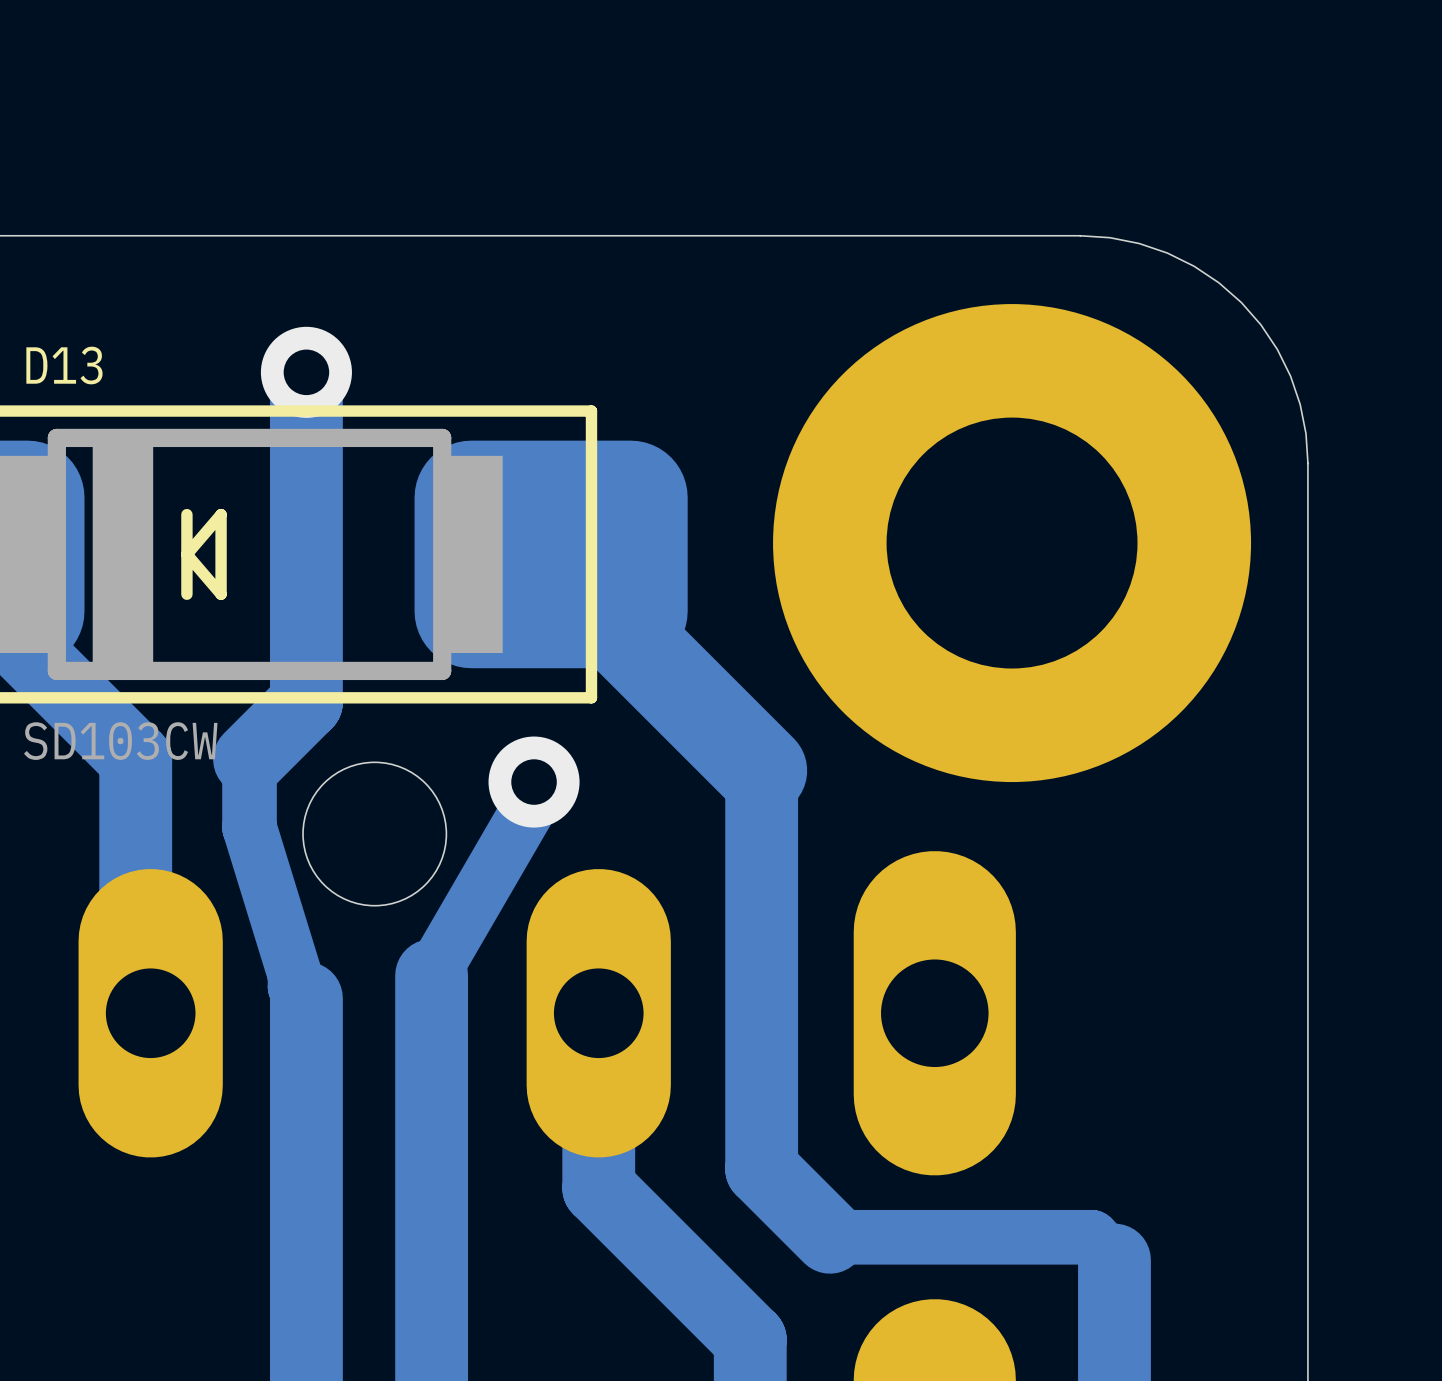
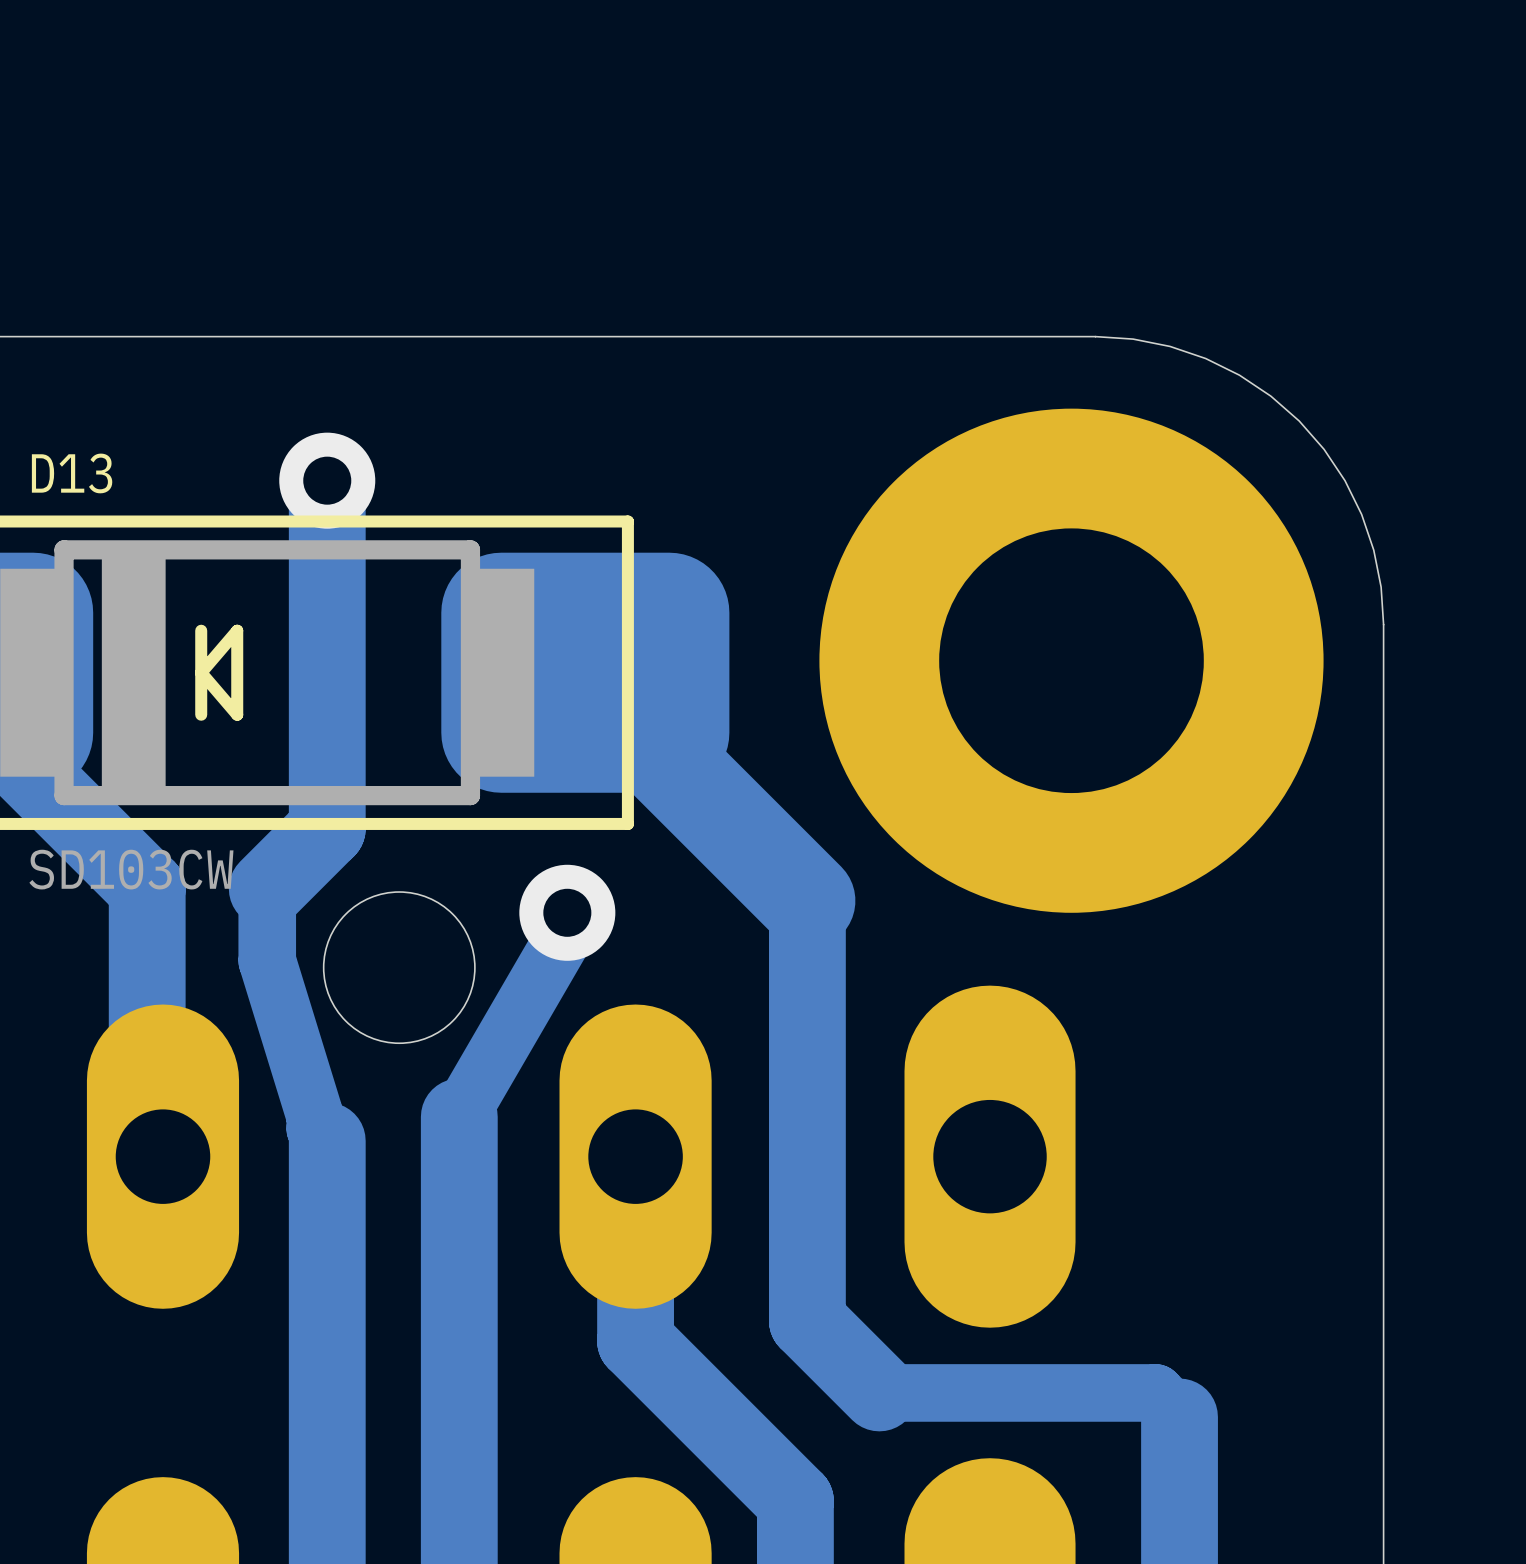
board edge: (1034, 235) (1110, 237) (1139, 243) (1167, 253) (1194, 266) (1218, 282) (1241, 302) (1260, 324) (1277, 349) (1290, 376) (1300, 404) (1306, 433) (1307, 508) -> (1095, 336) (1133, 339) (1170, 346) (1205, 358) (1239, 375) (1270, 396) (1299, 421) (1324, 449) (1344, 480) (1361, 514) (1373, 550) (1381, 587) (1383, 624)

